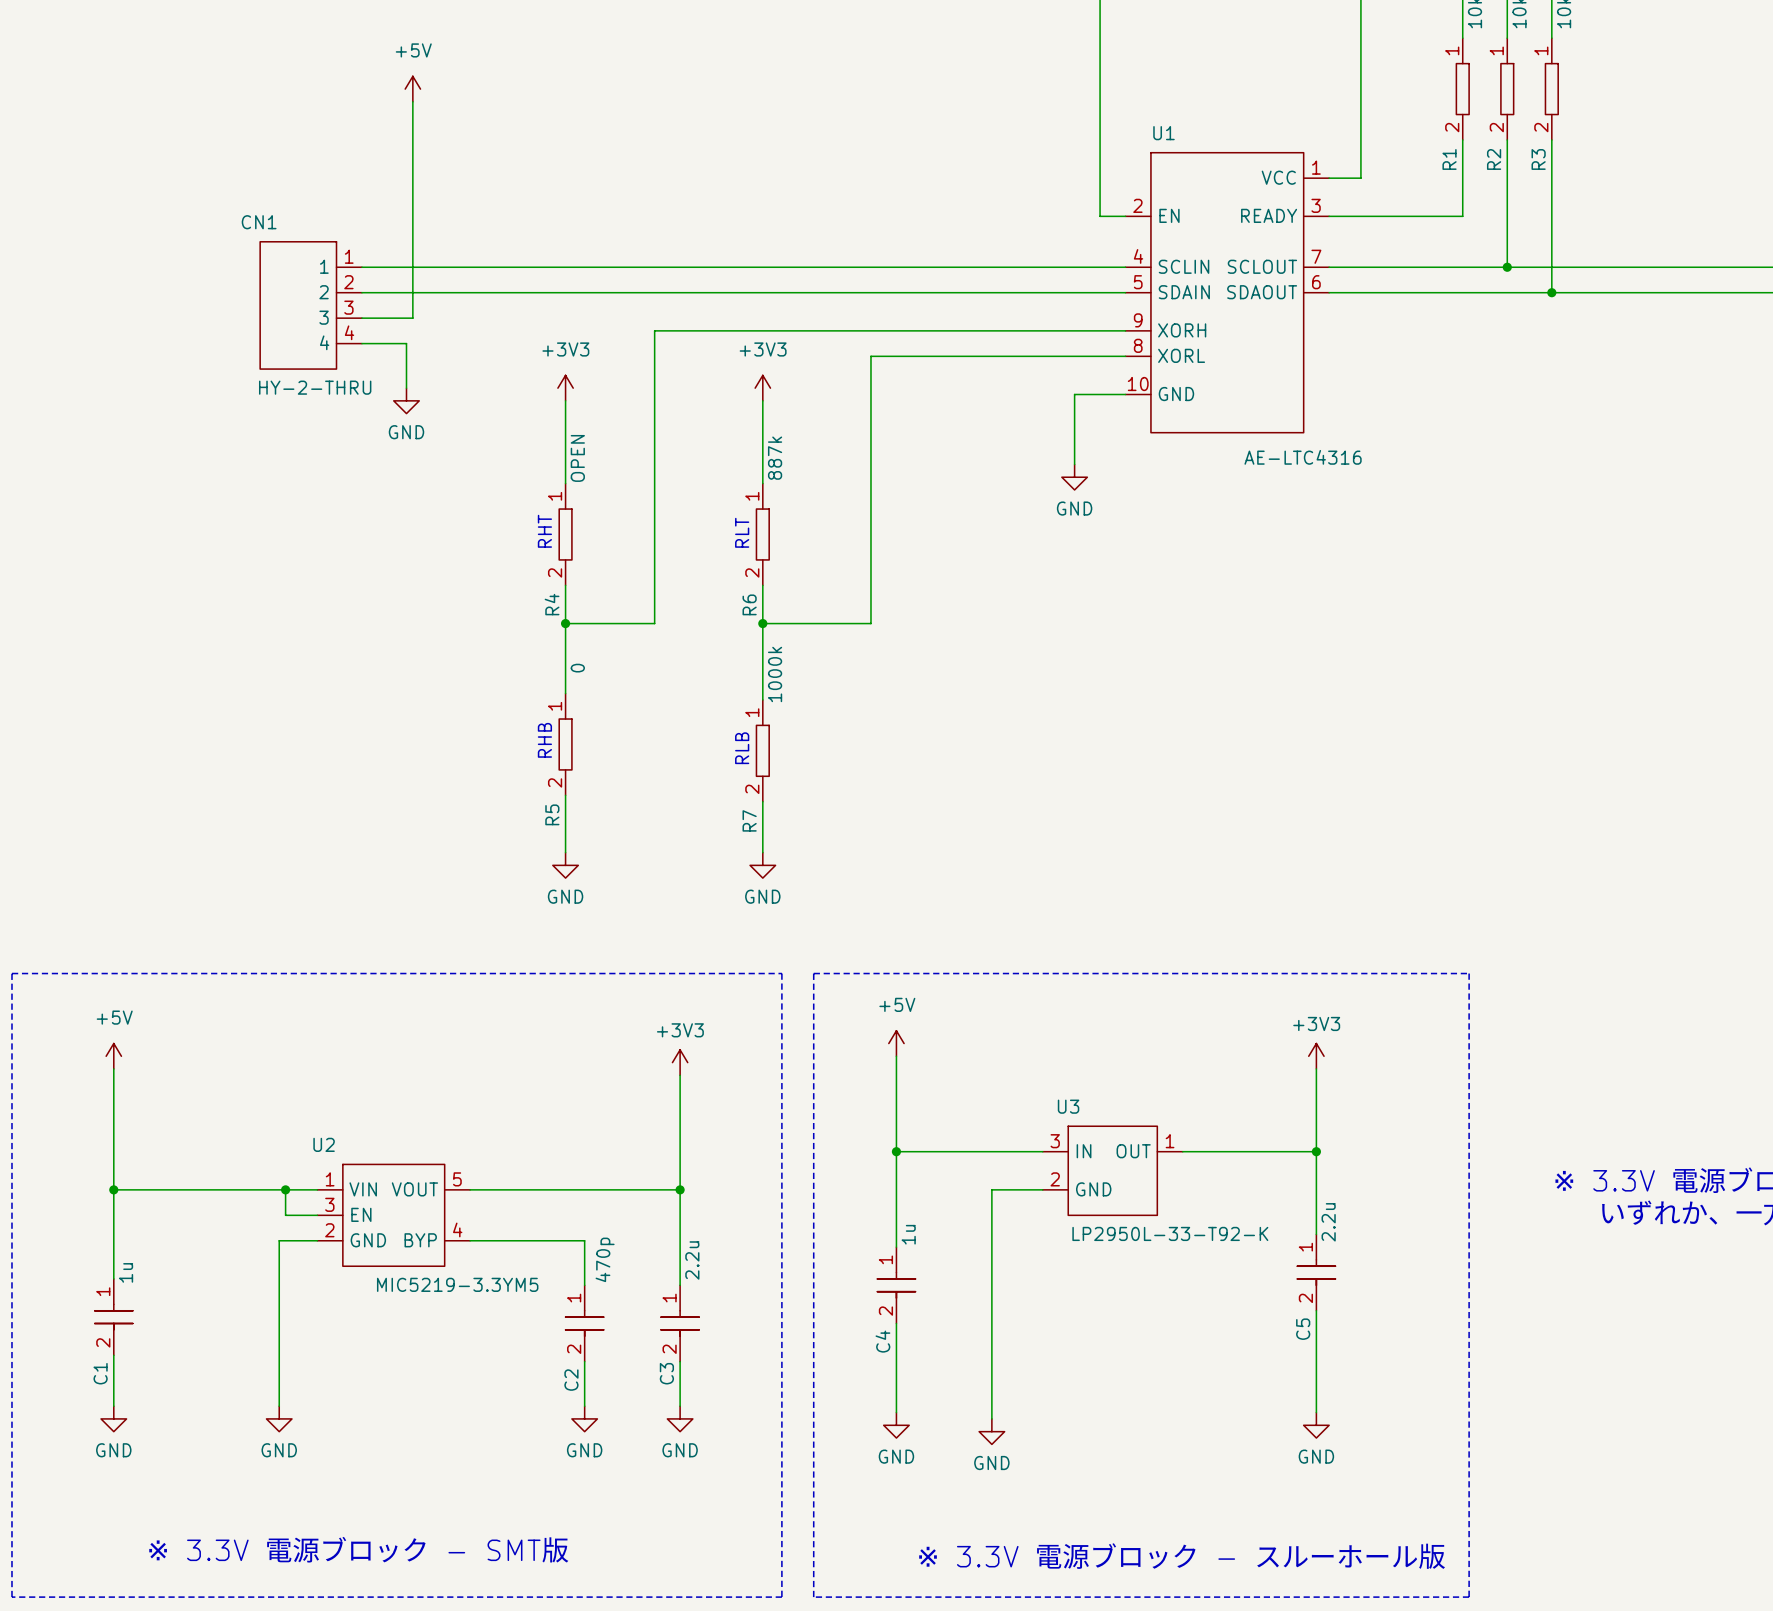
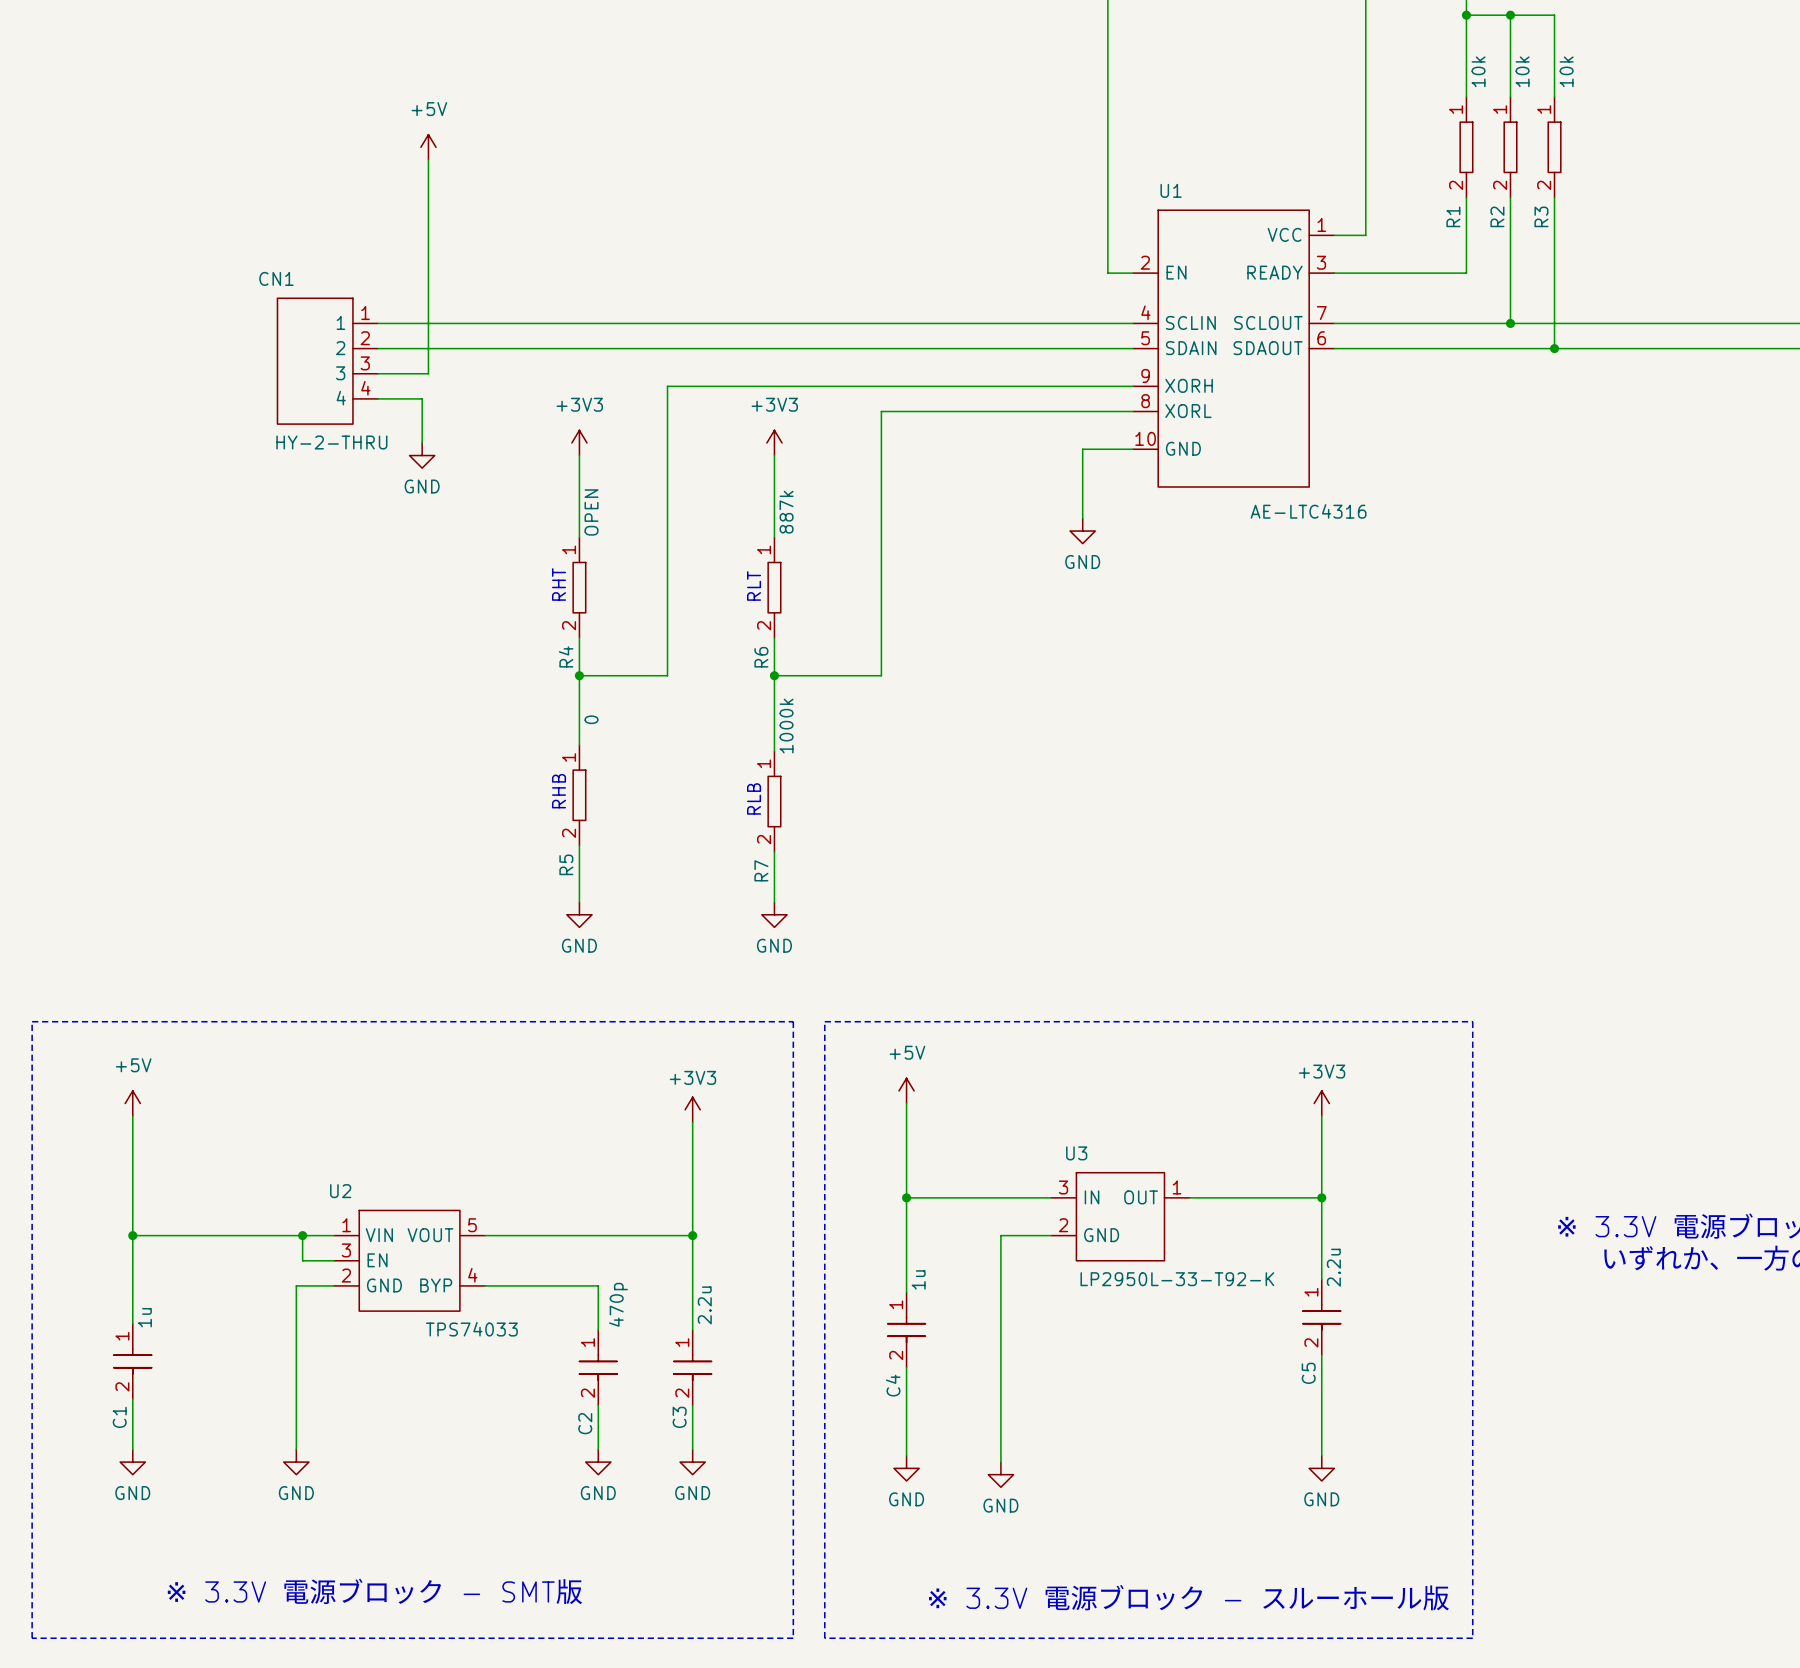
U2 value: MIC5219-3.3YM5 (457, 1284) -> TPS74033 (471, 1329)

